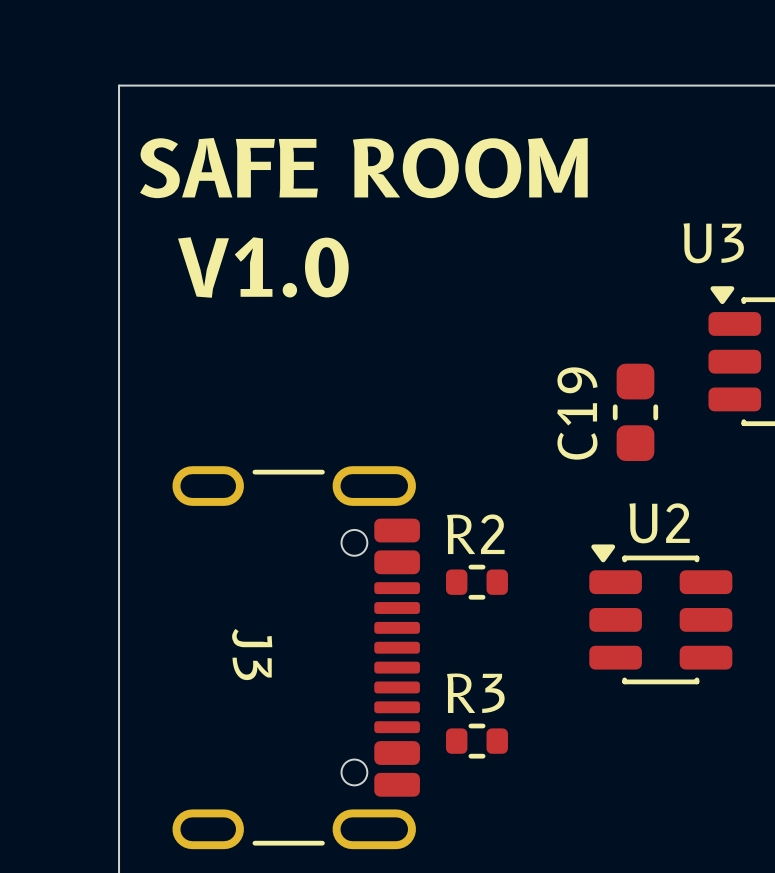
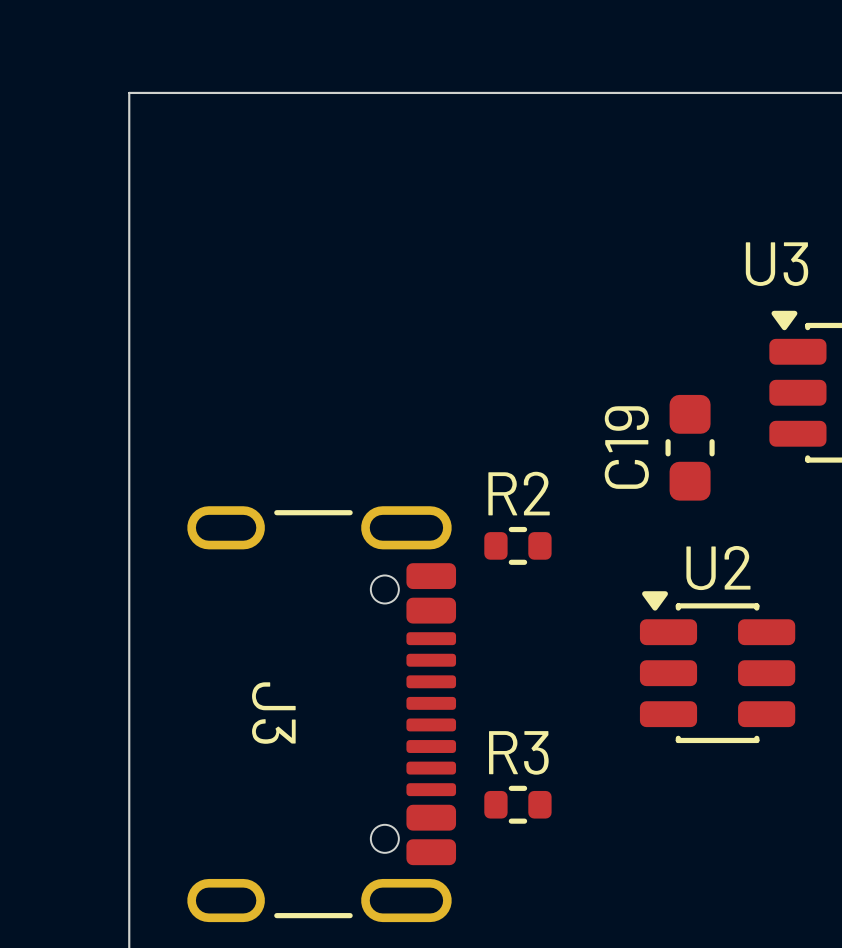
text: SAFE ROOM (363, 168) -> none
text: V1.0 (263, 267) -> none
R2 position: (476, 582) -> (517, 545)

